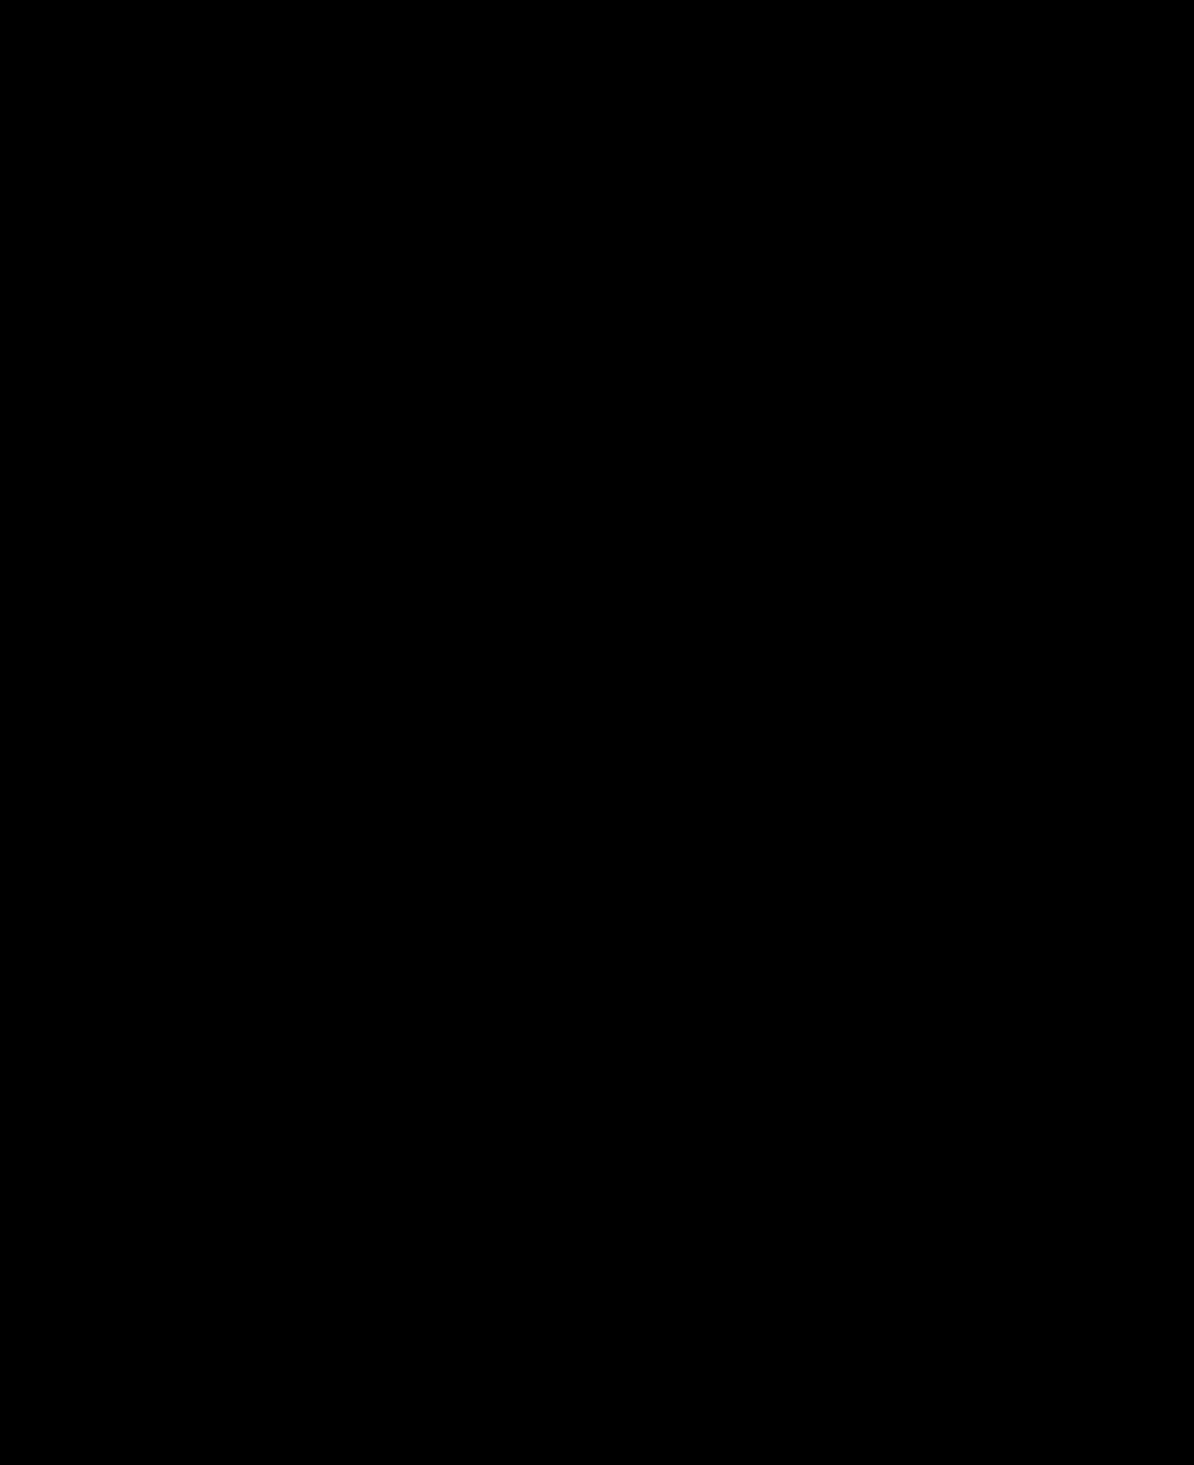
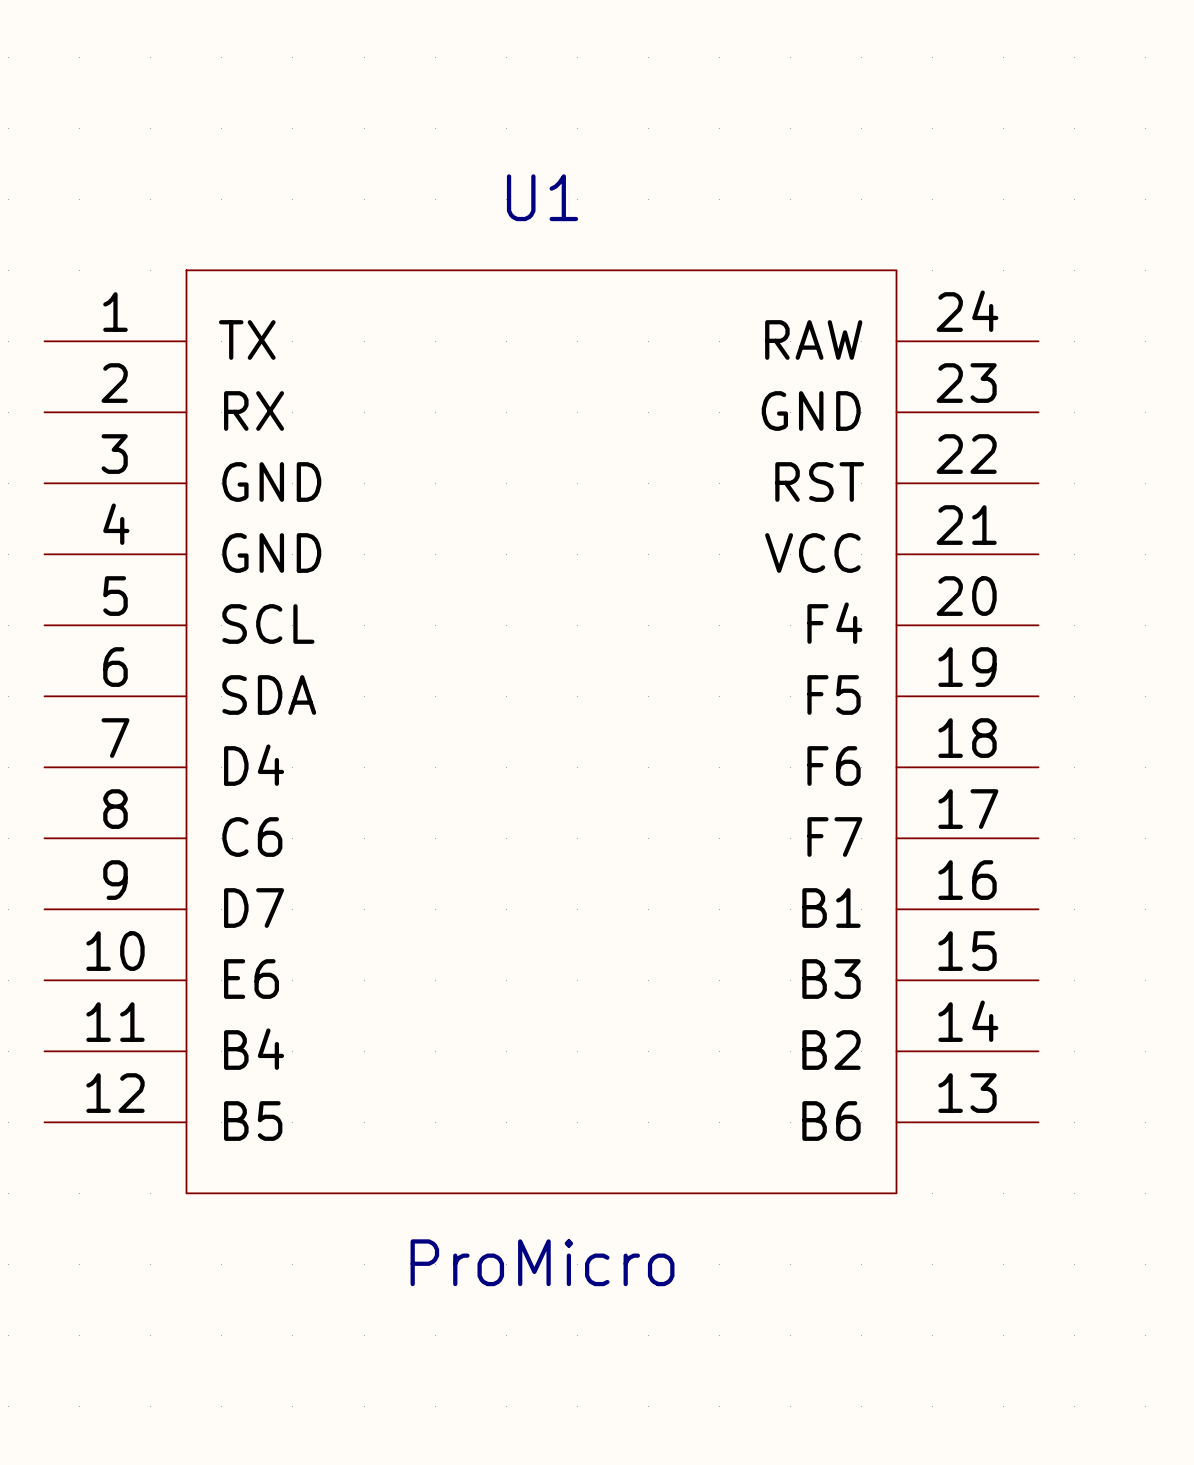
U1: none -> ProMicro (541, 731)

